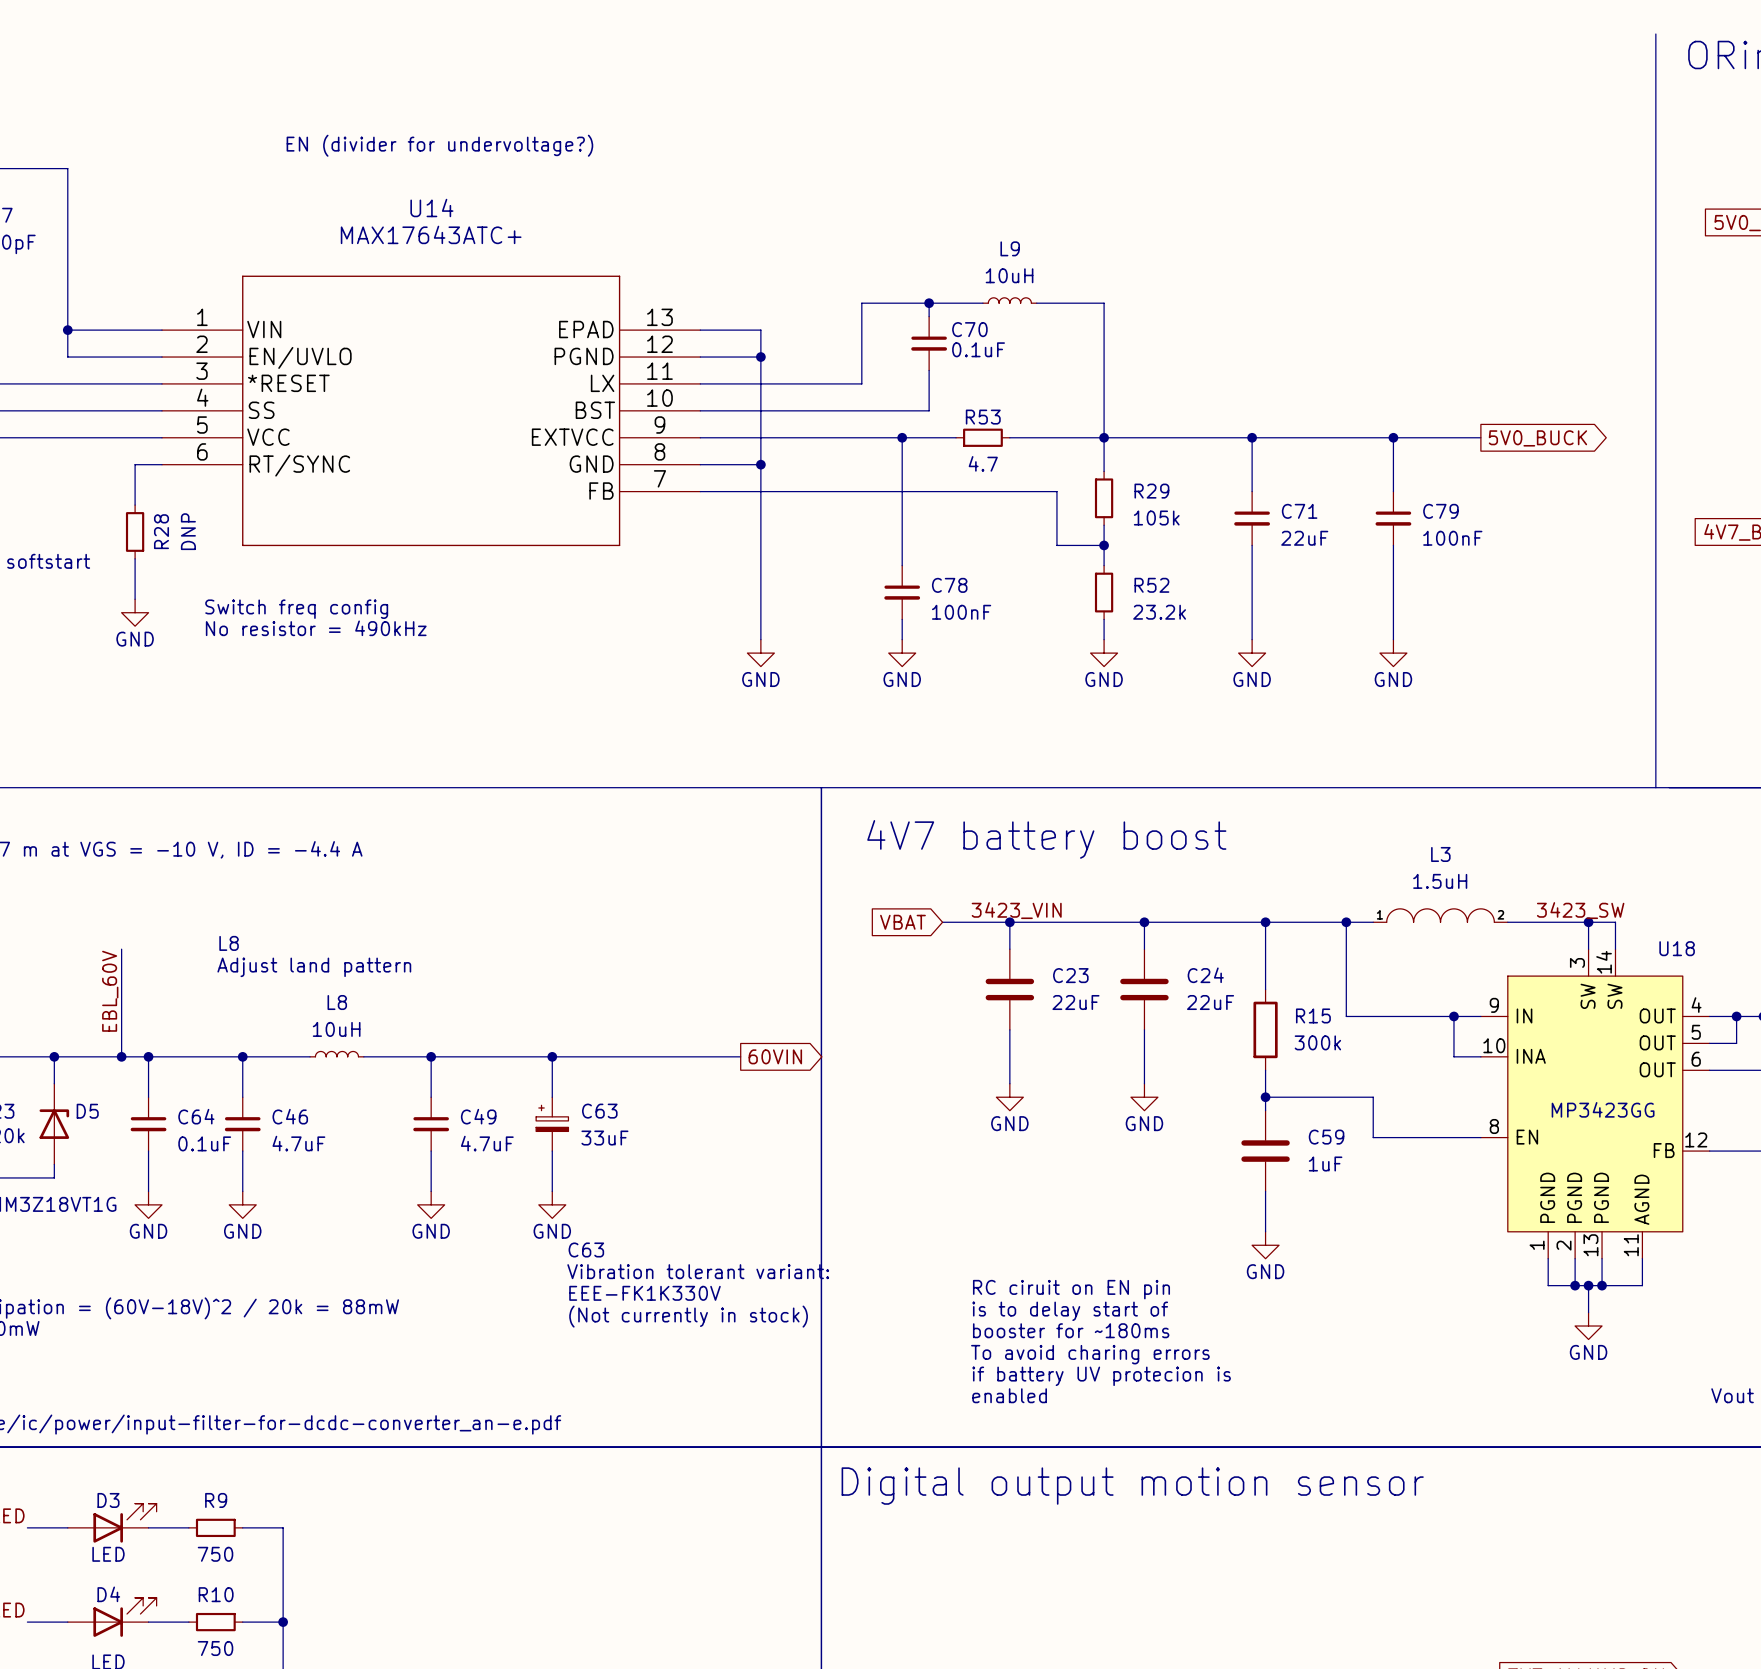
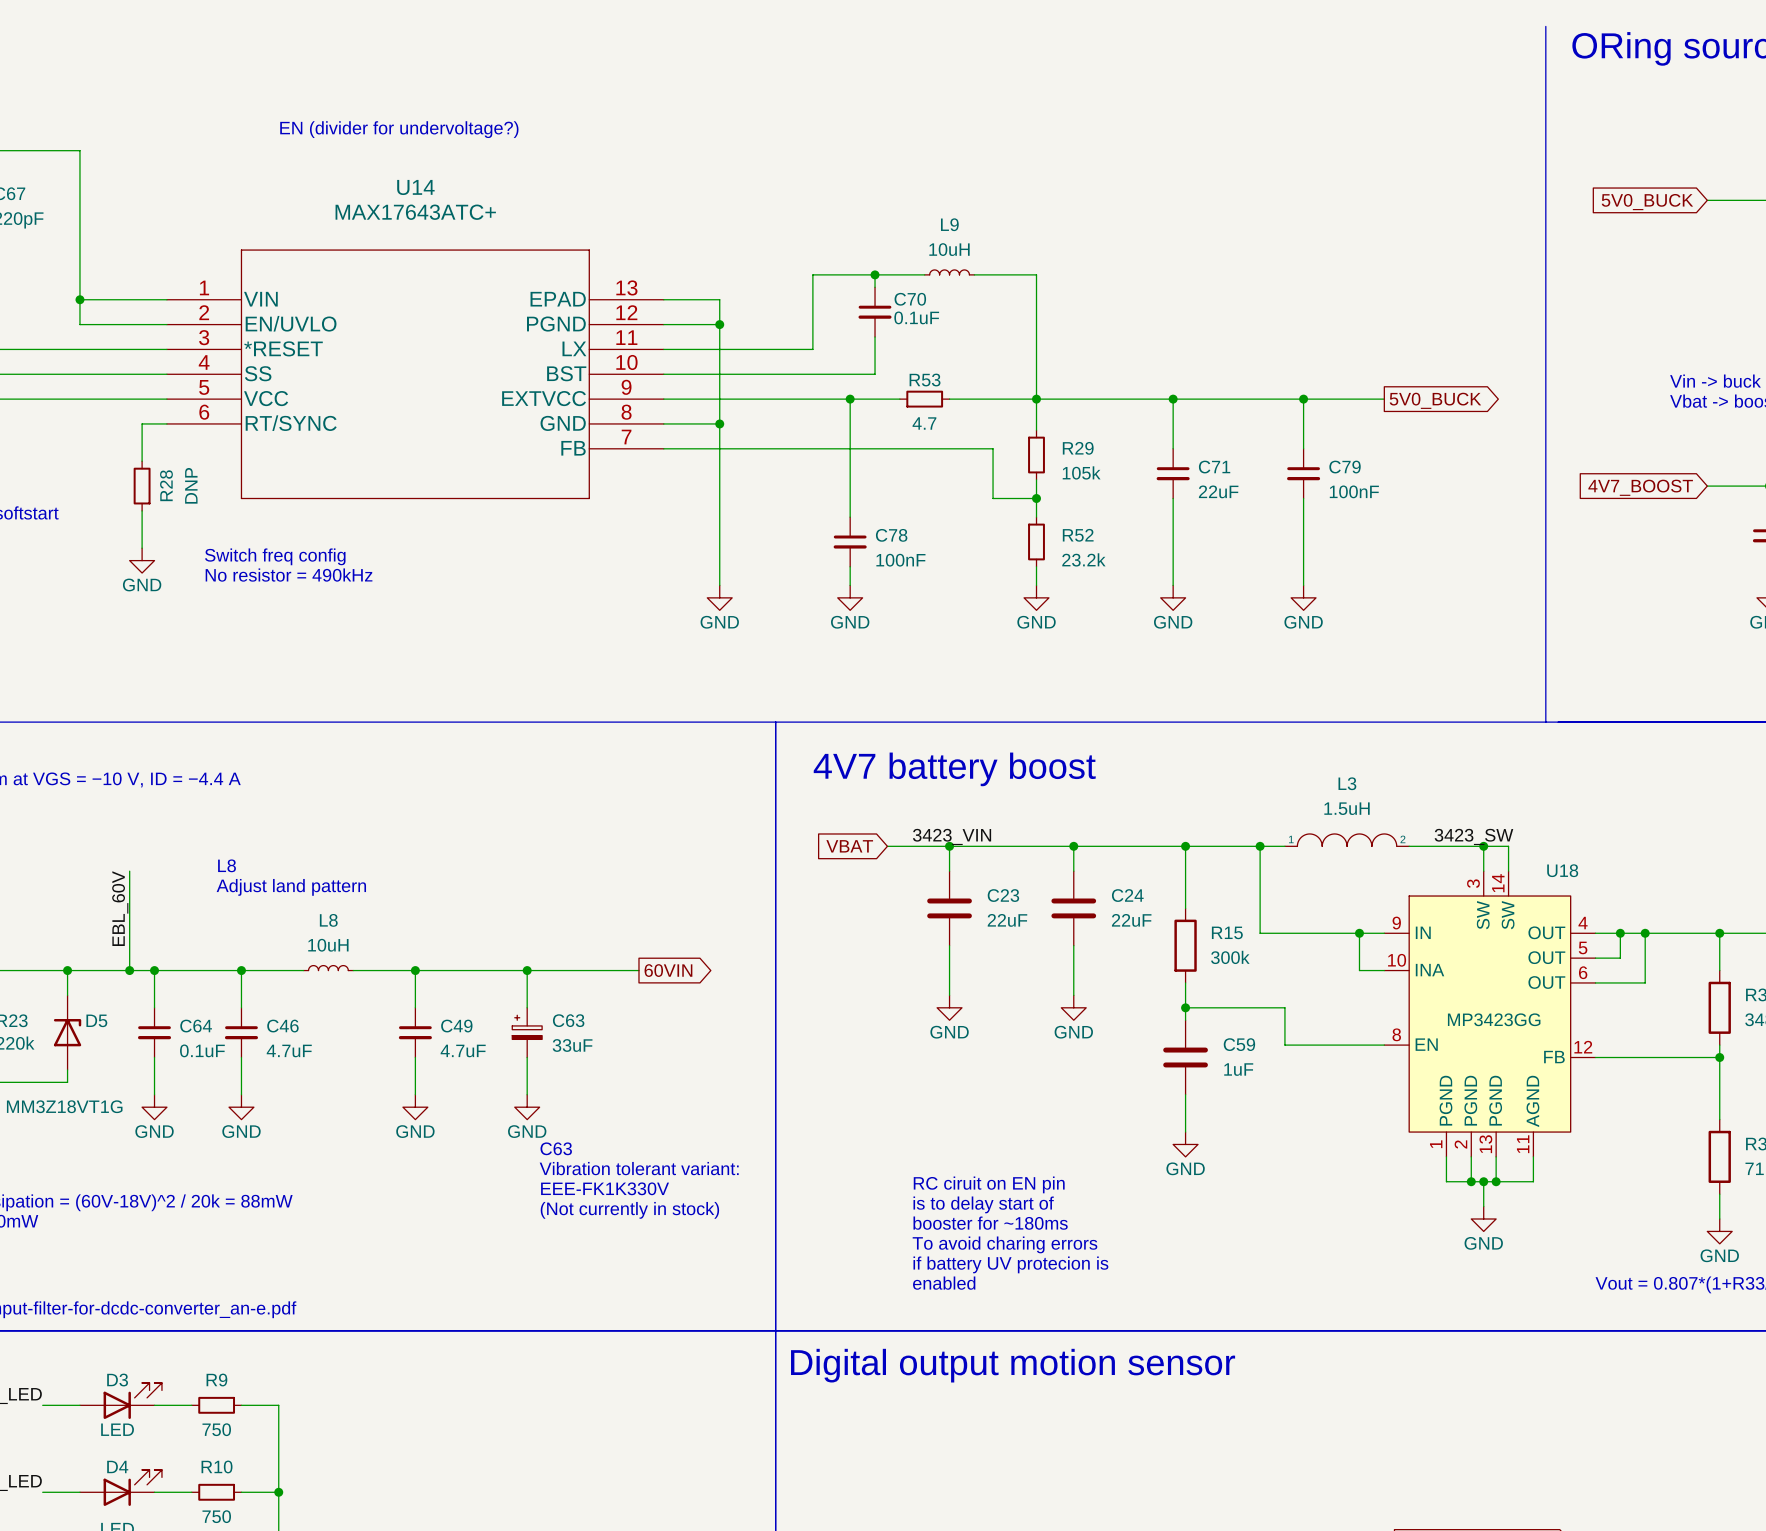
wire: (673, 1056) (740, 1056) -> none
global label position: 60VIN (775, 1056) -> 60VIN (668, 970)

